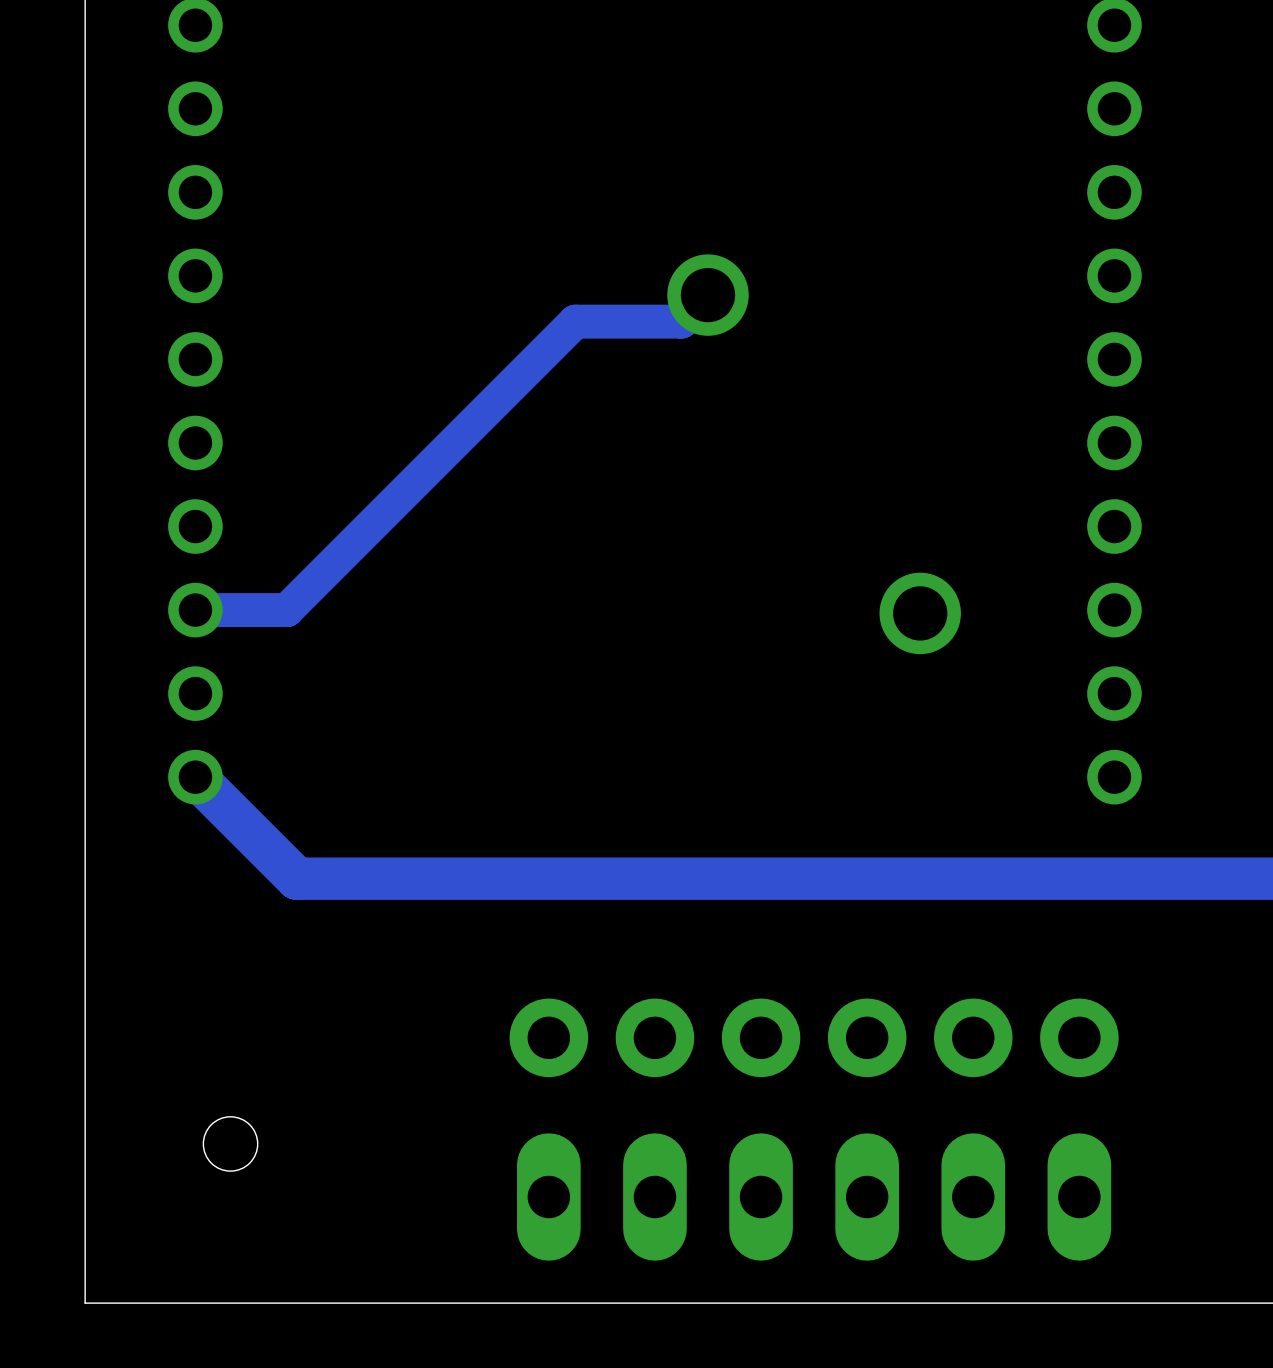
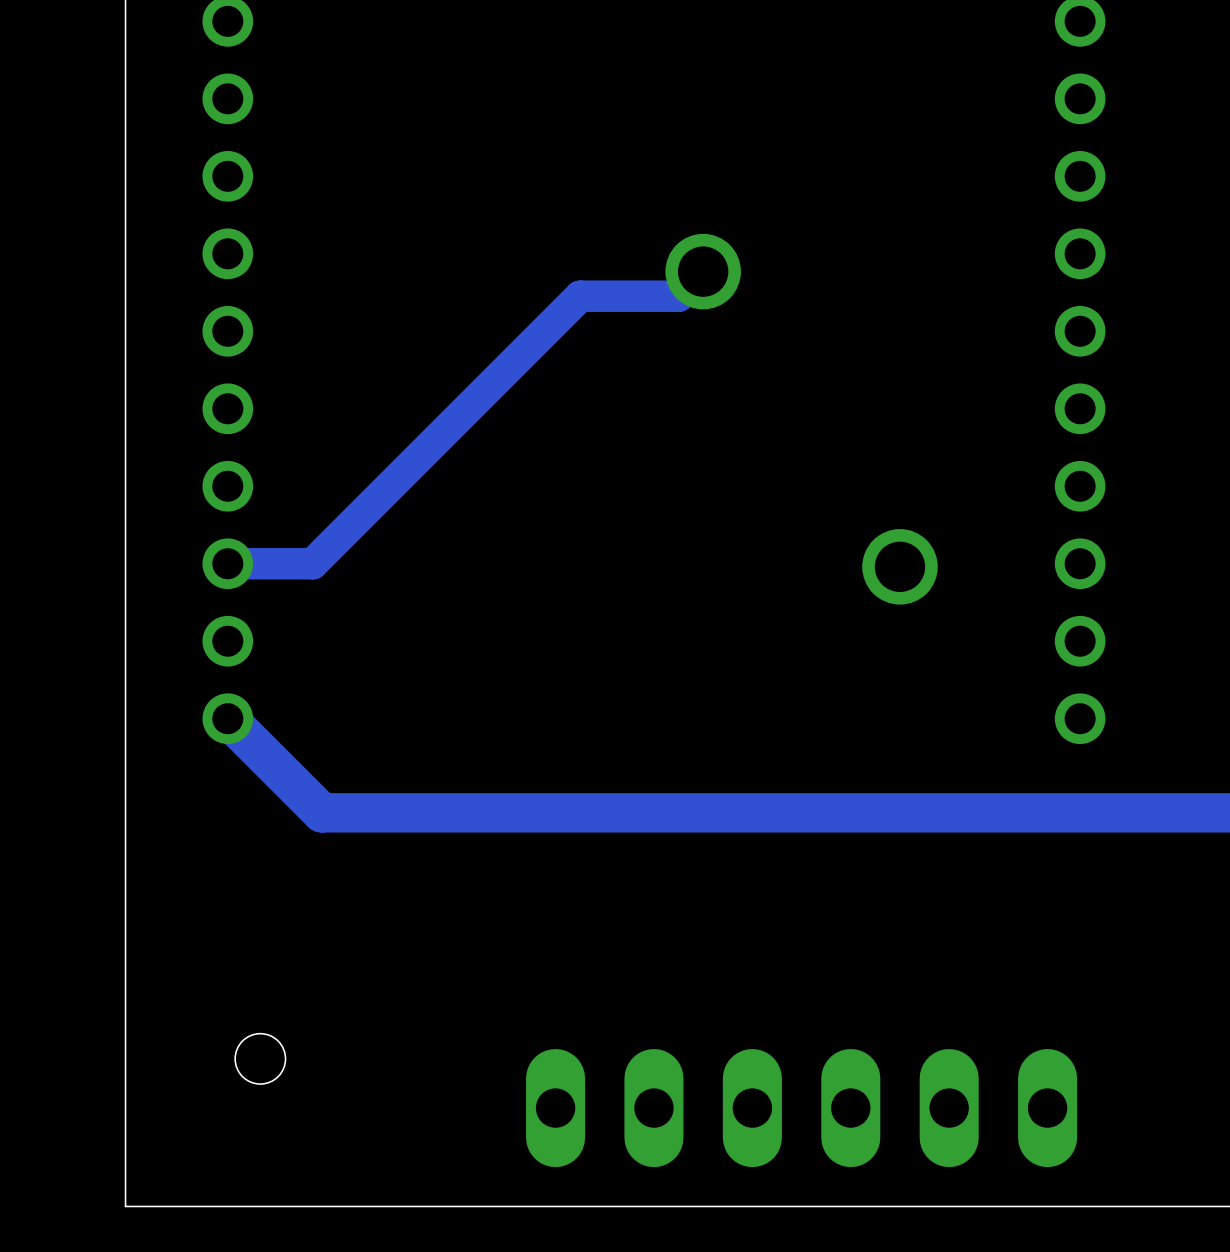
part: (814, 1037) -> none

